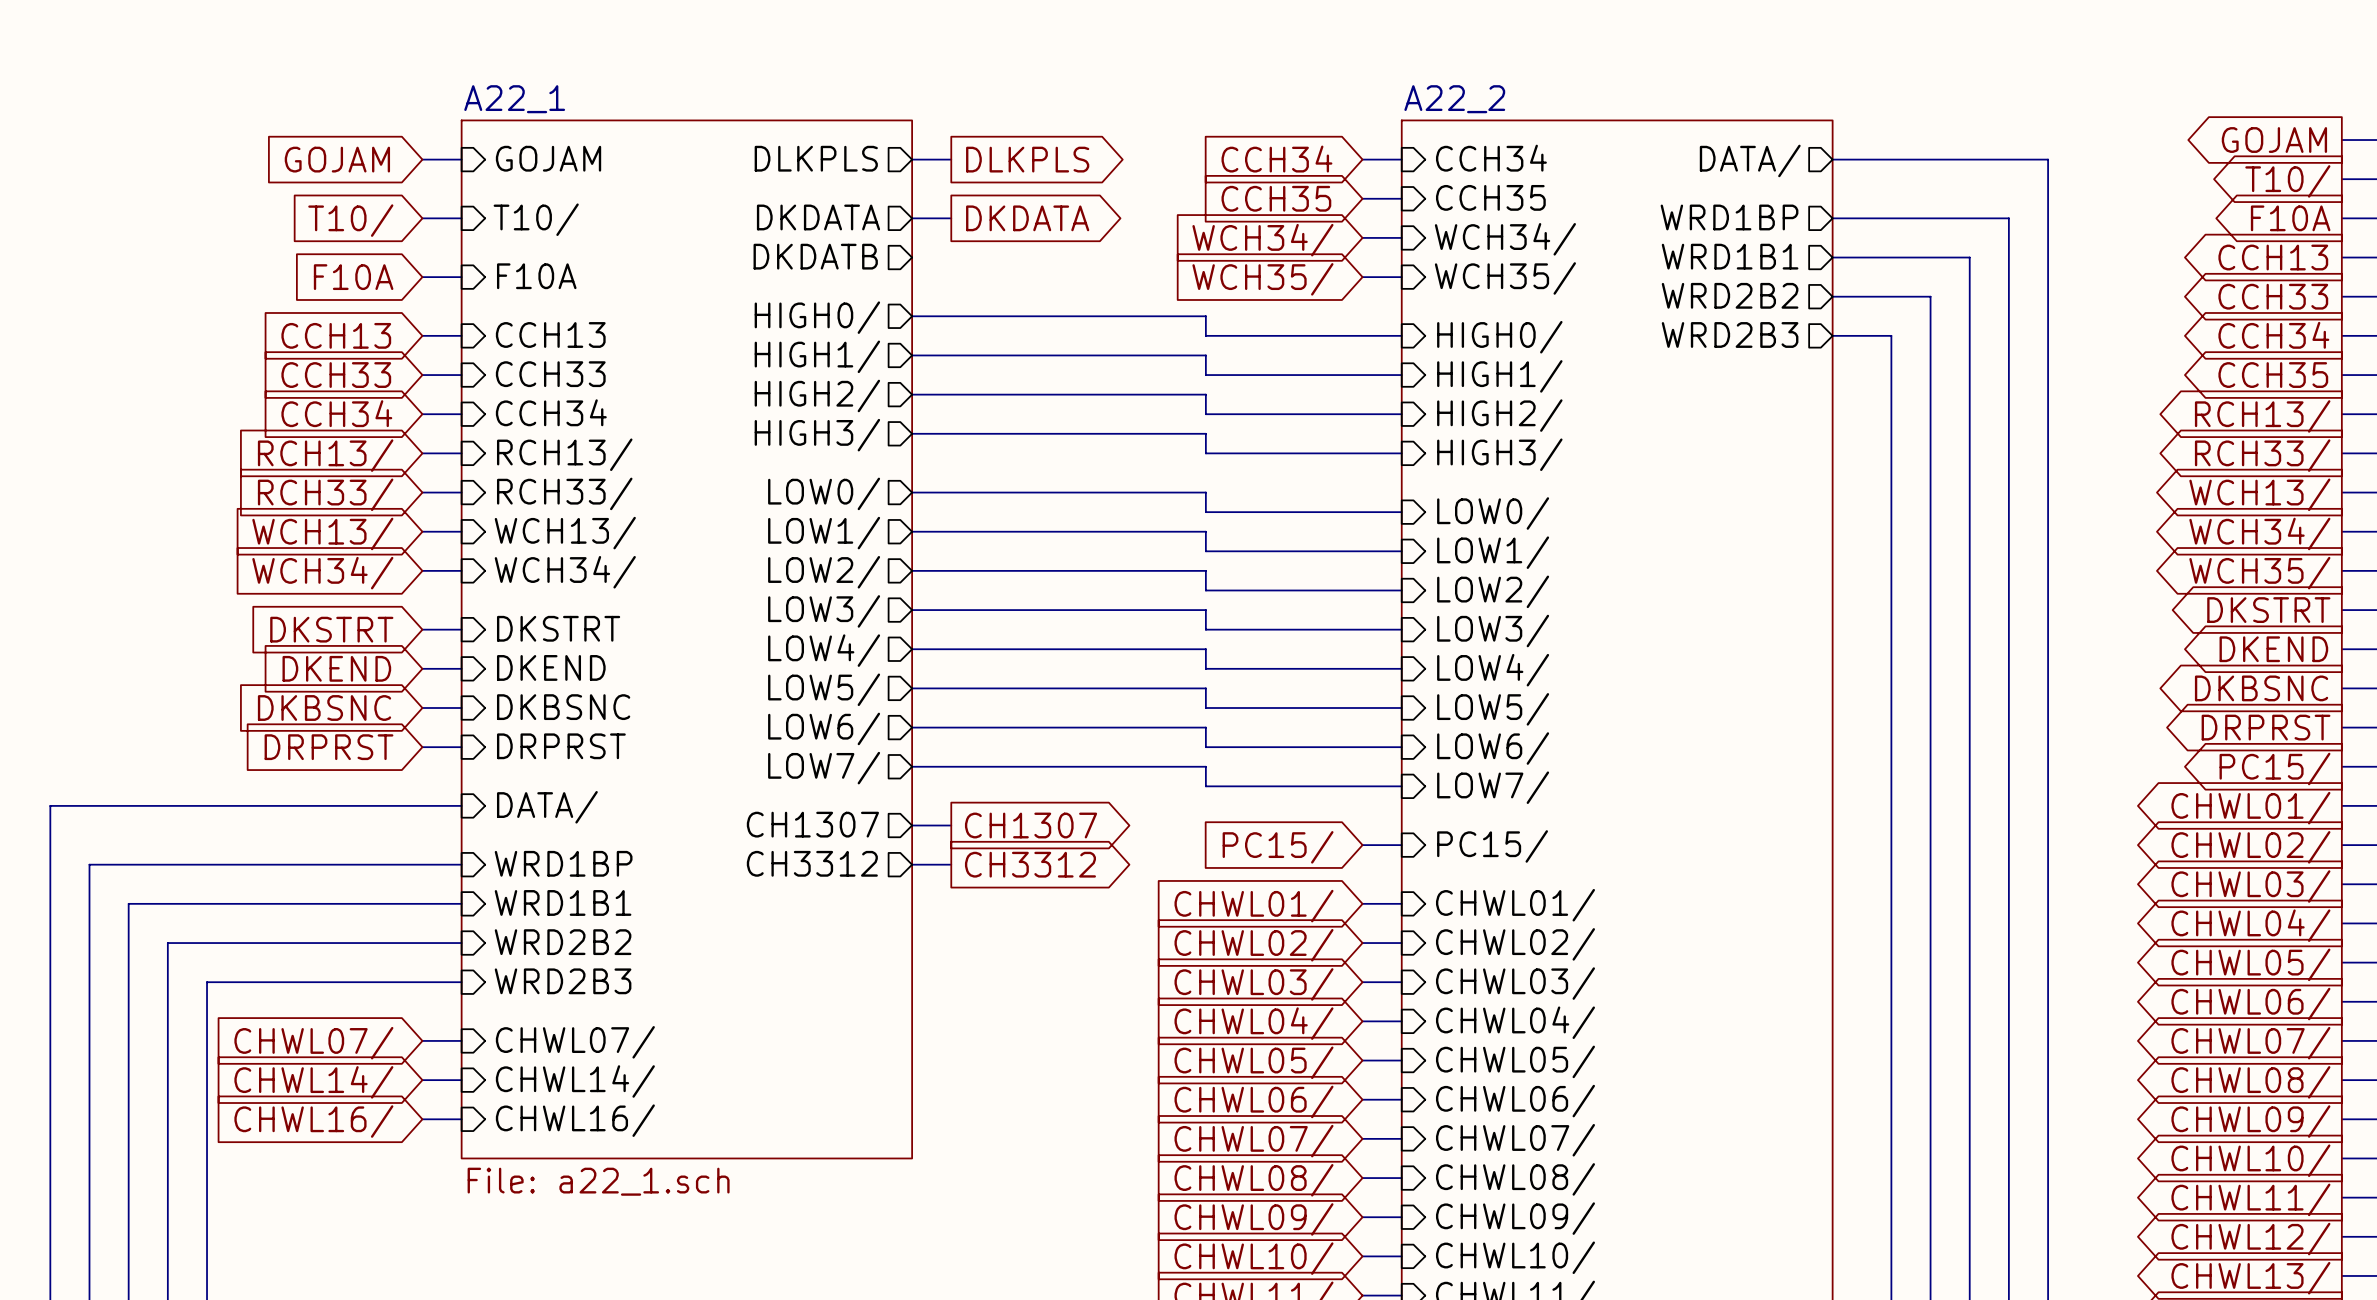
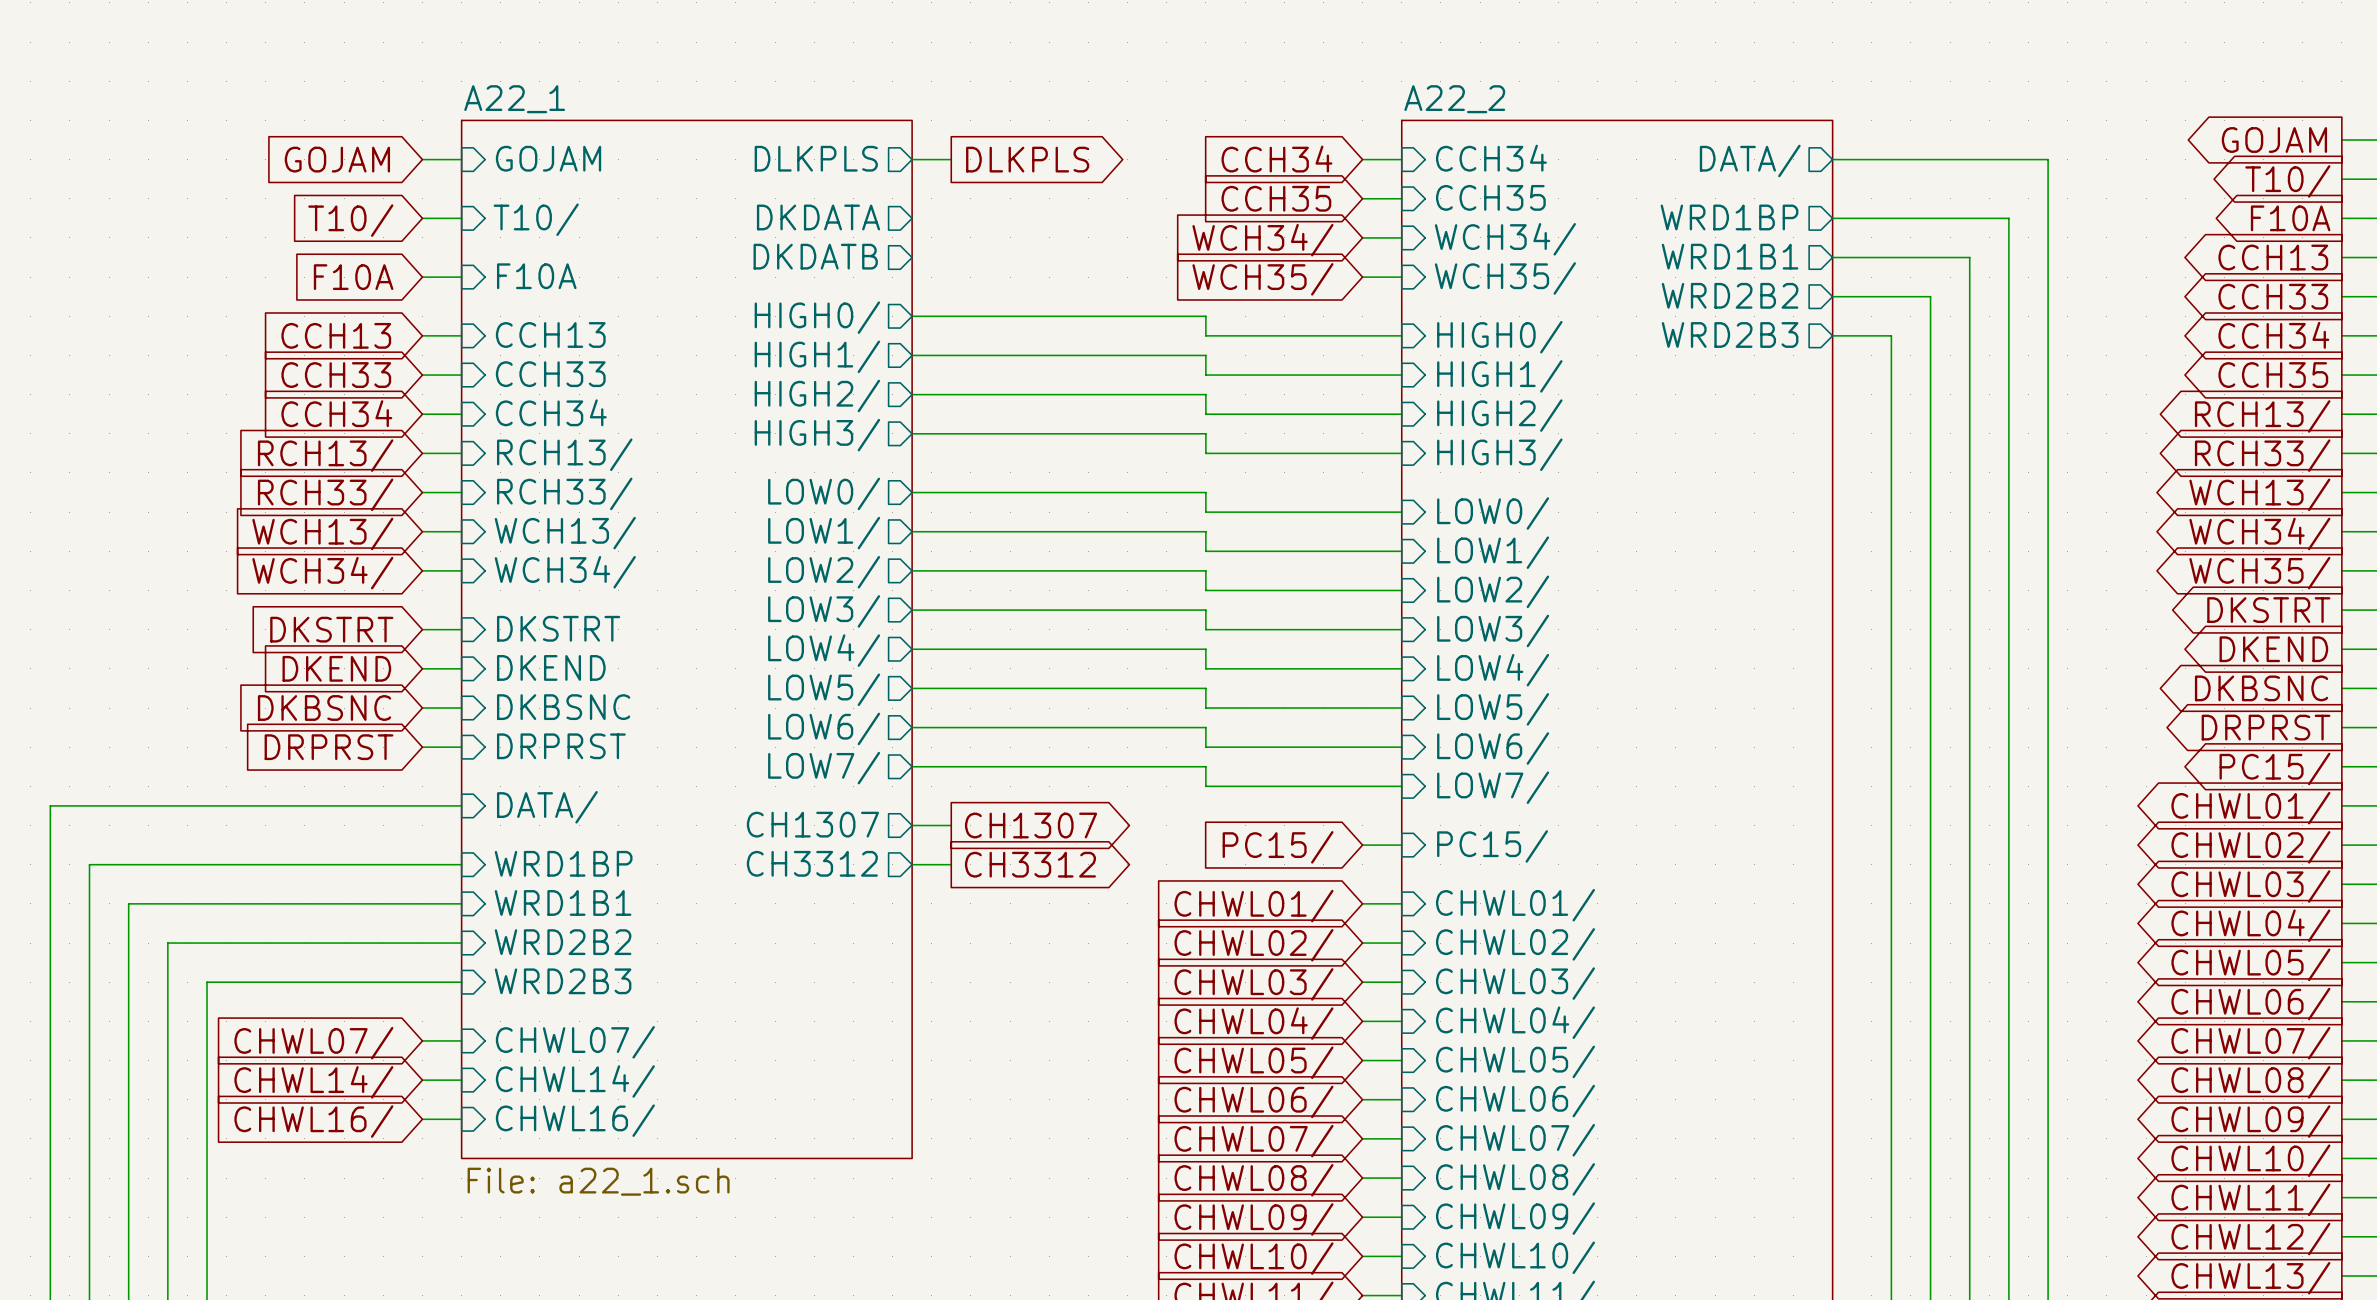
wire: (912, 218) (951, 218) -> none
global label: DKDATA (1027, 218) -> none

